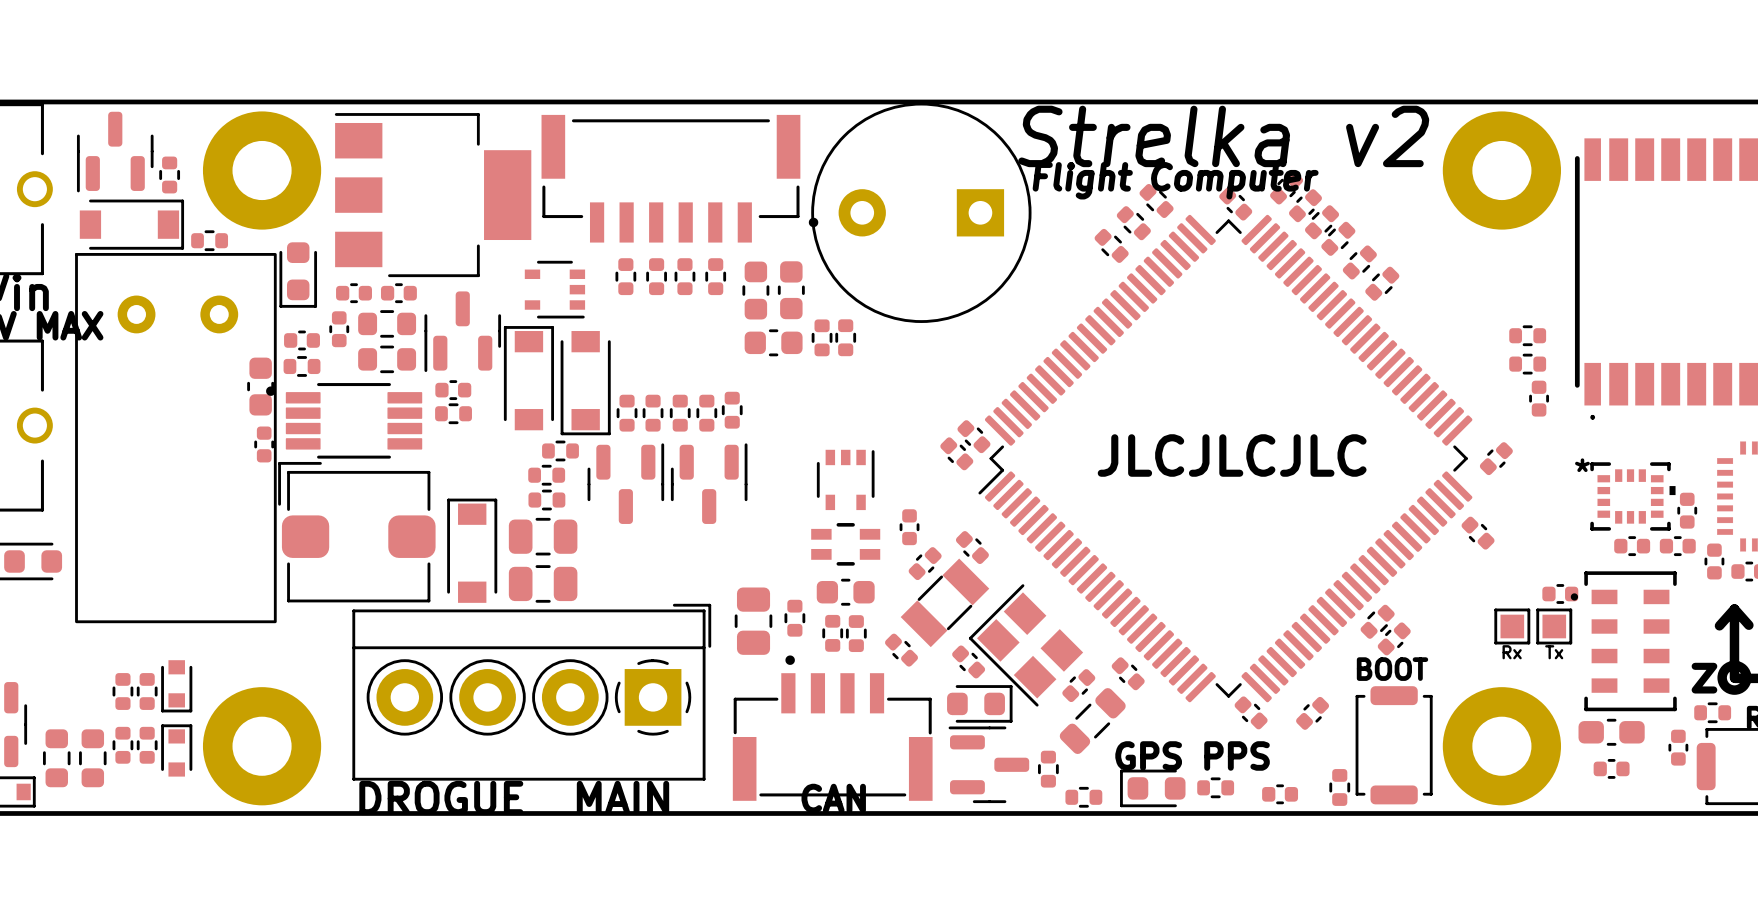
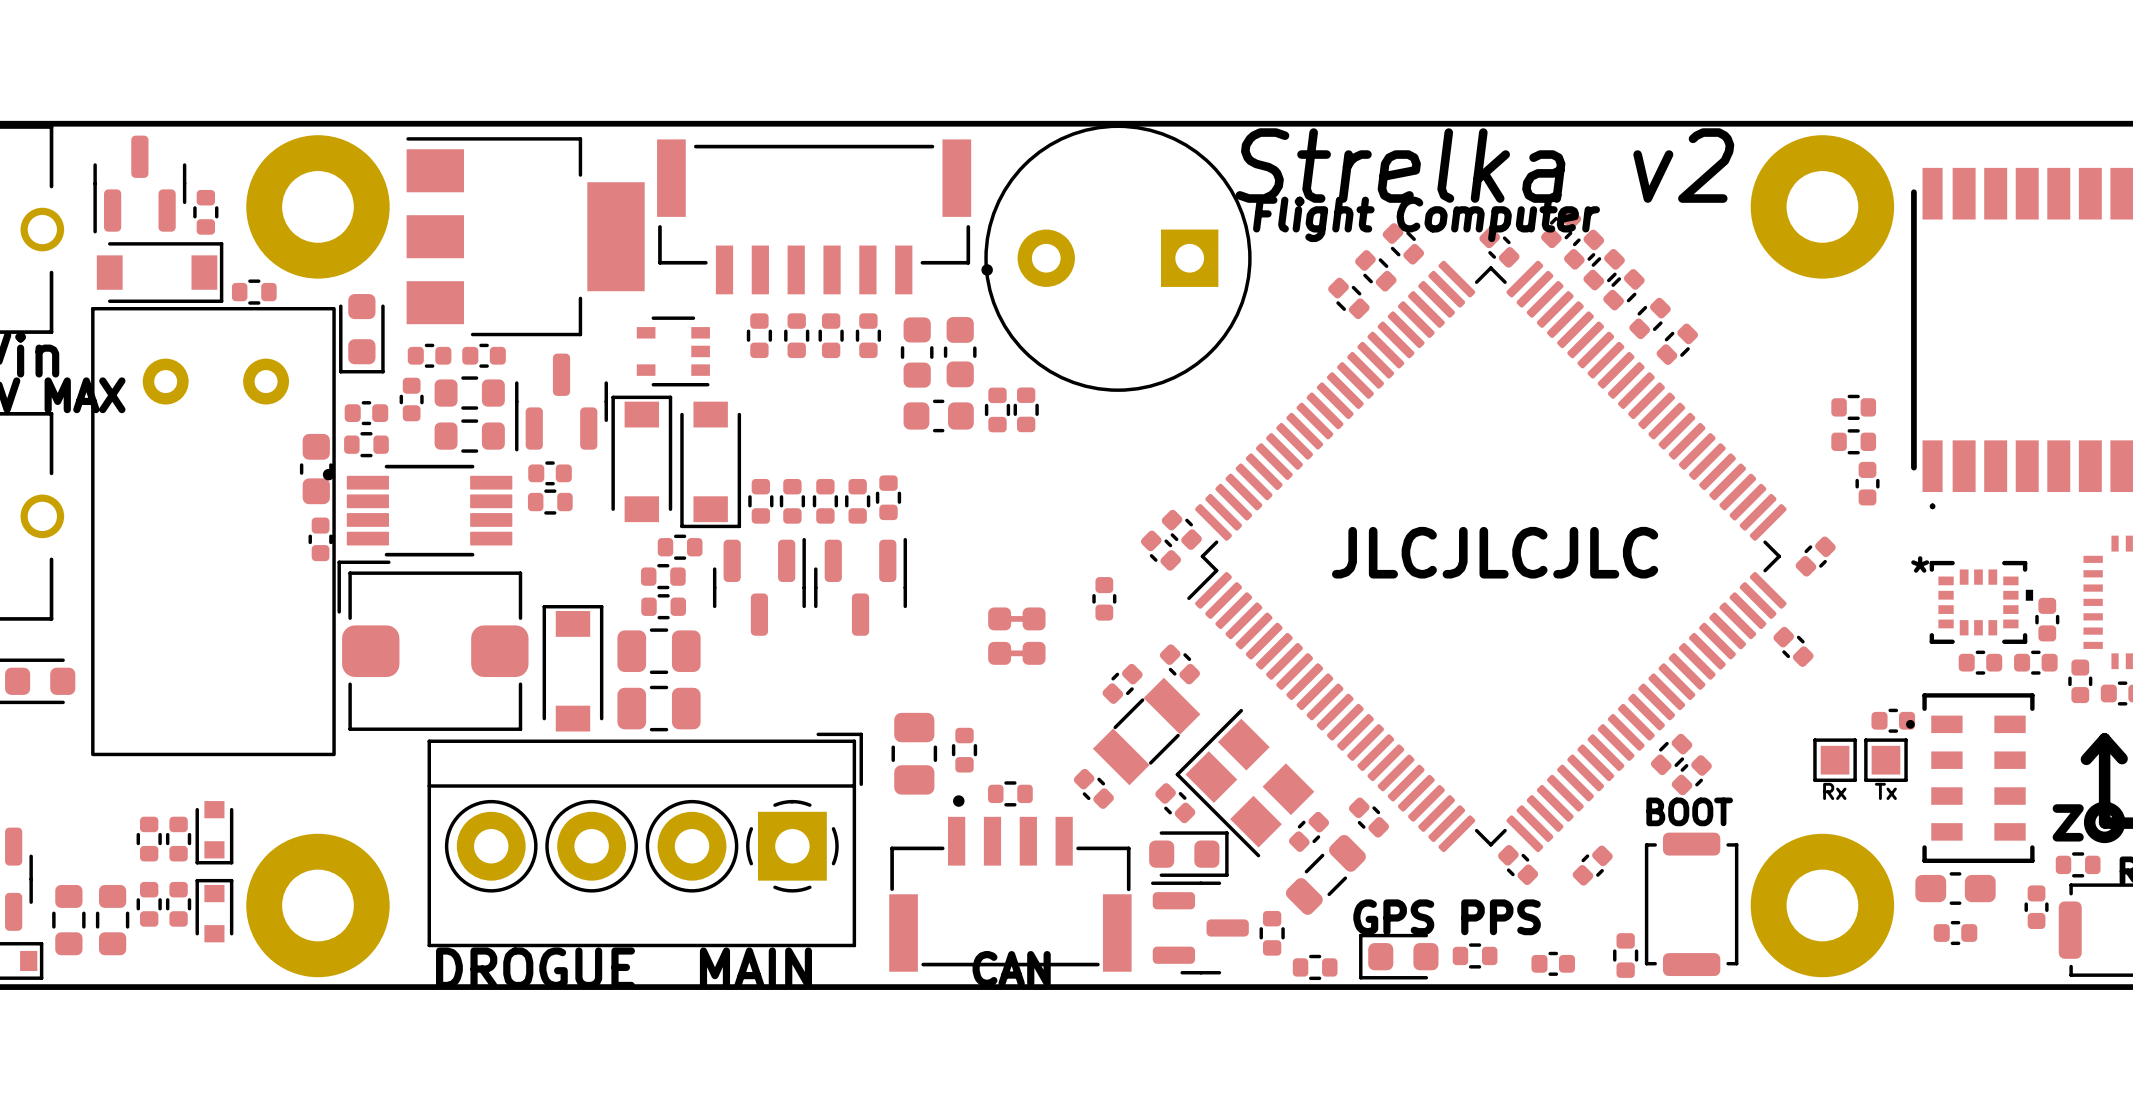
part: (845, 479) -> none
part footprint: [811, 523, 881, 566] -> [988, 607, 1046, 665]
part position: (909, 527) -> (1104, 598)
part: (845, 592) -> none
part: (832, 633) -> none
part: (856, 633) -> none
part: none -> (1010, 793)

